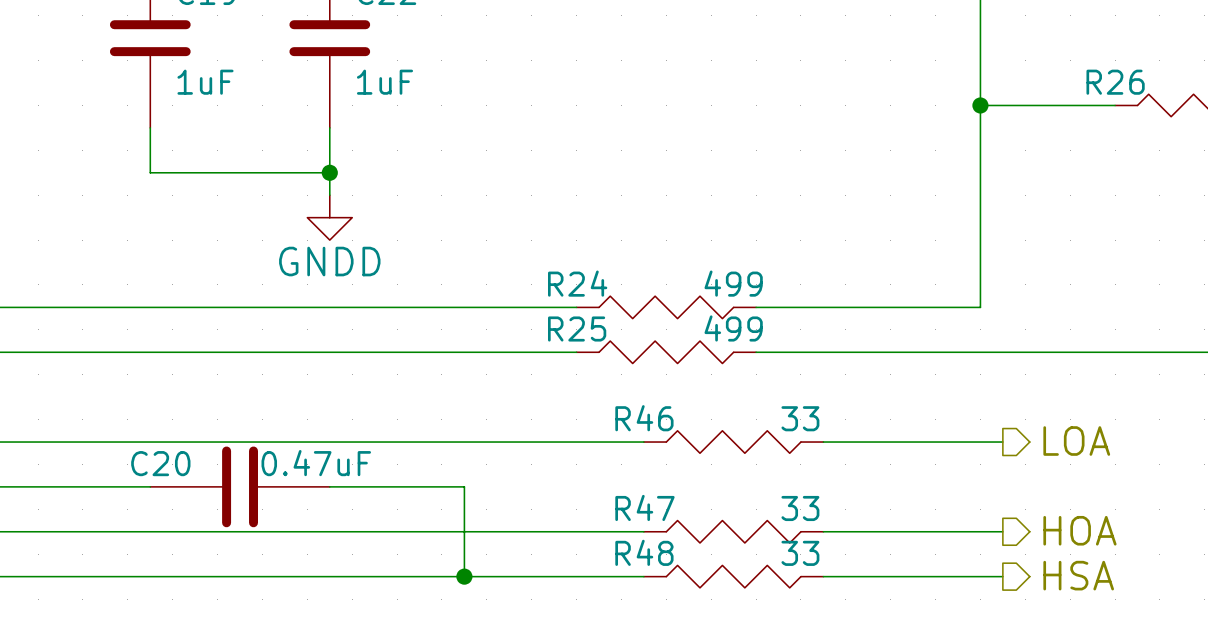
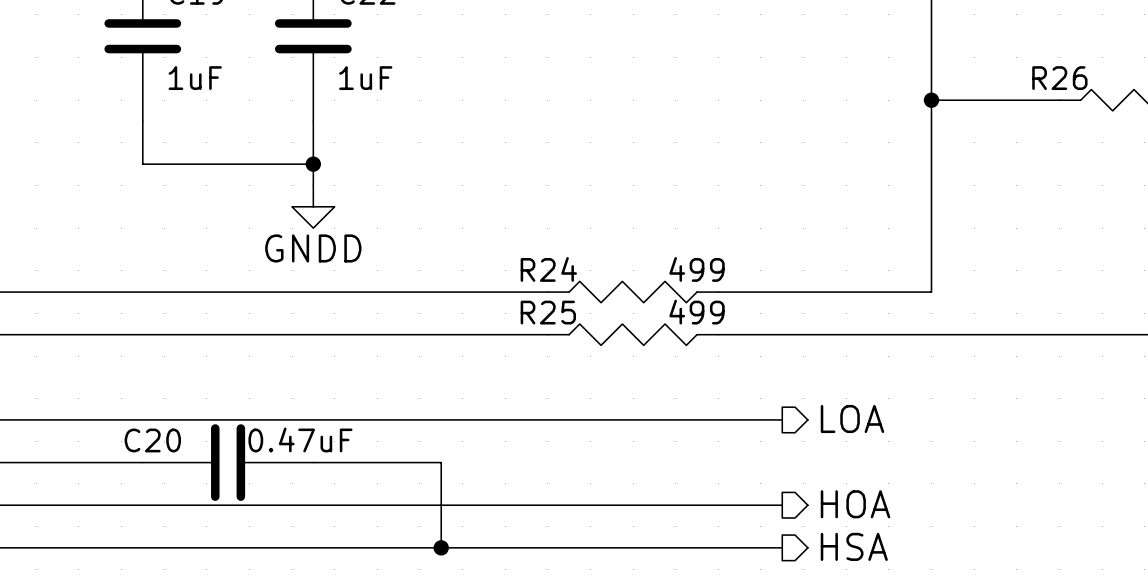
hierarchical label position: LOA (1076, 441) -> LOA (852, 418)
R46: 33 (733, 442) -> none
wire: (823, 442) (1002, 442) -> (782, 419) (611, 419)
hierarchical label position: HOA (1079, 530) -> HOA (855, 504)
R47: 33 (733, 531) -> none
wire: (823, 531) (1002, 531) -> (782, 505) (611, 505)
hierarchical label position: HSA (1078, 575) -> HSA (854, 546)
R48: 33 (733, 576) -> none
wire: (823, 576) (1002, 576) -> (782, 547) (611, 547)

